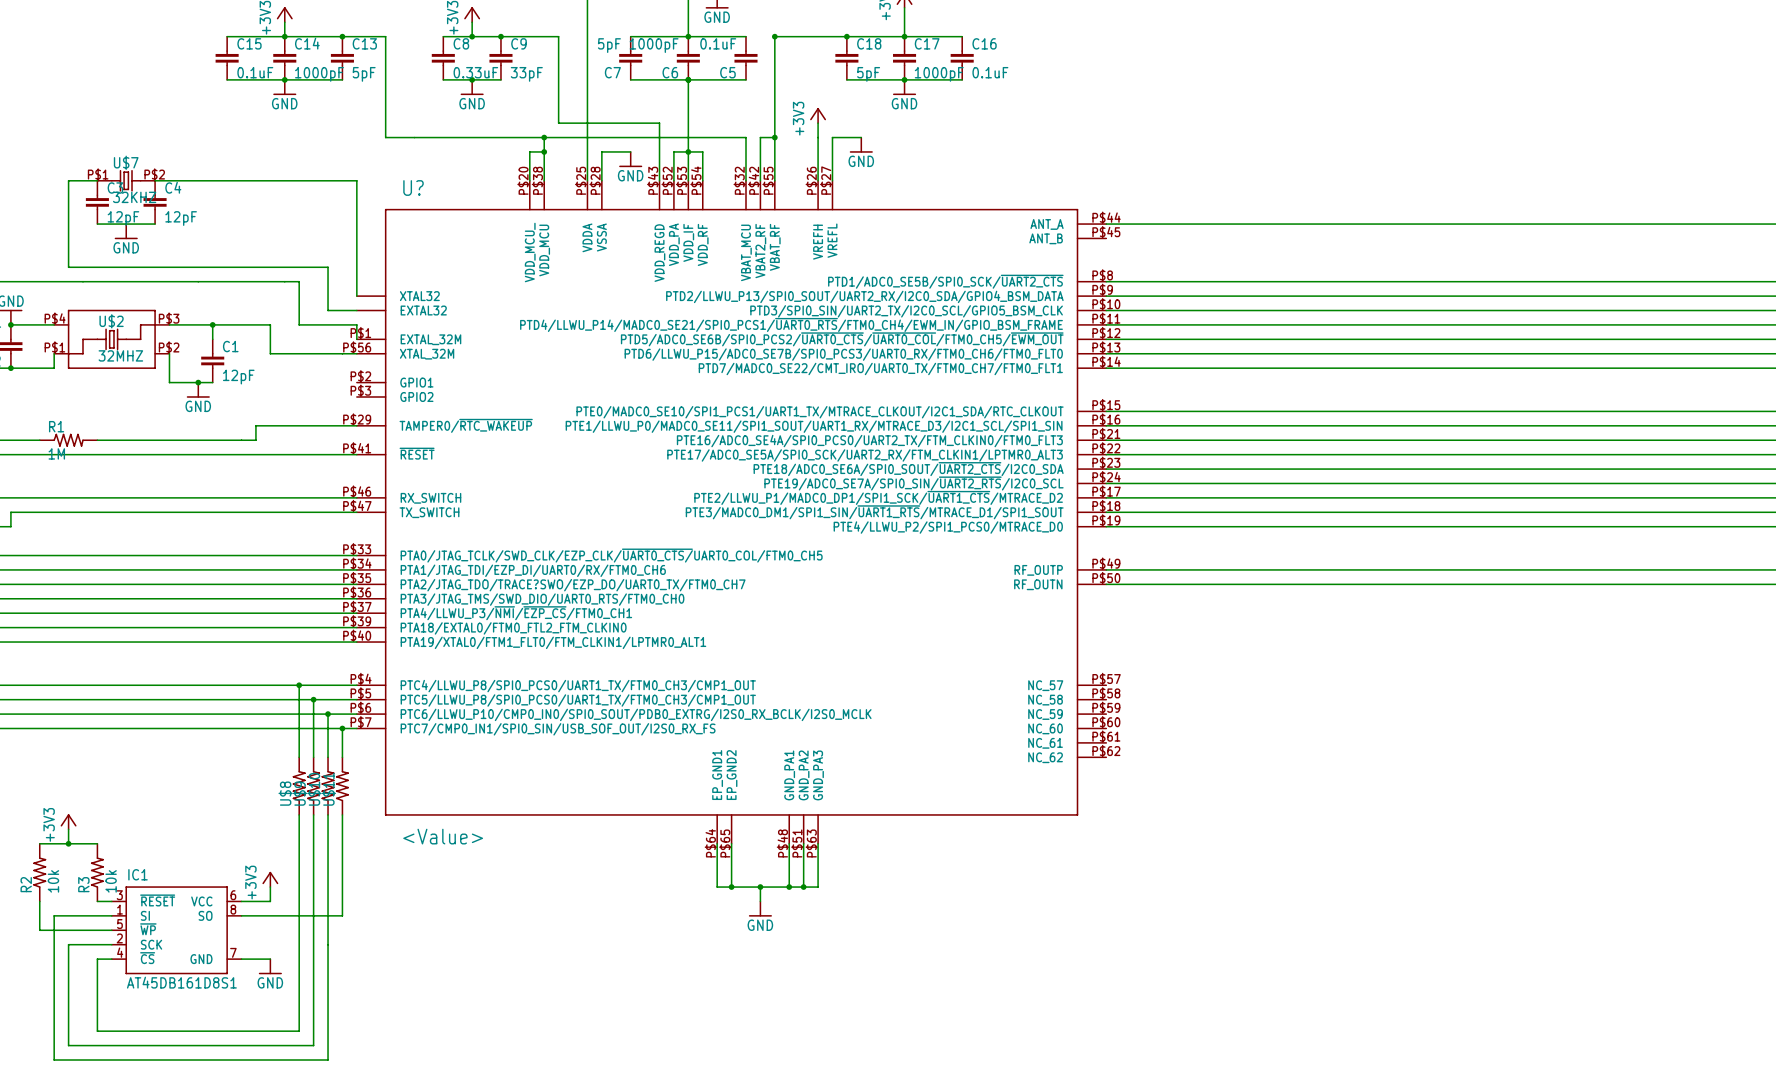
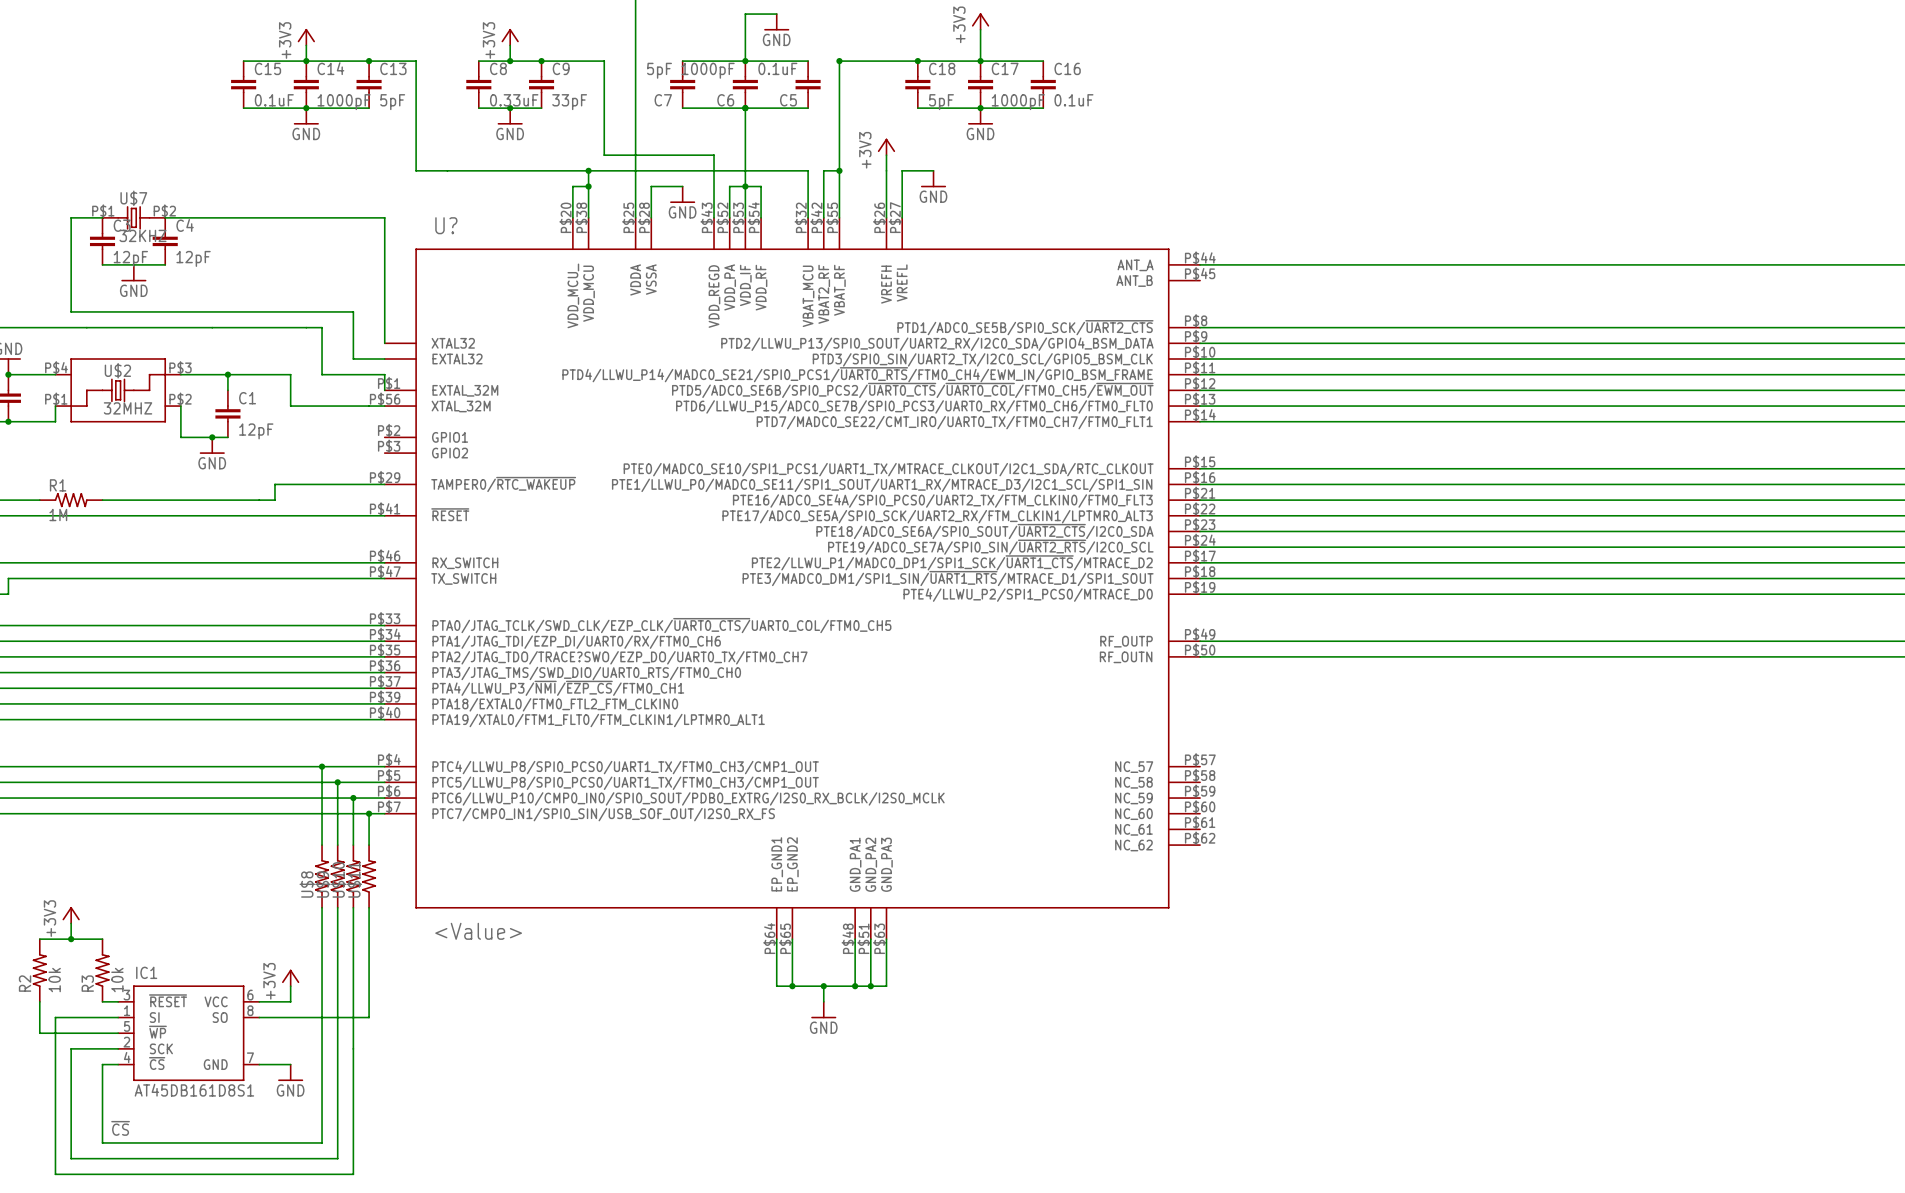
label: none -> ~{CS} (120, 1128)

